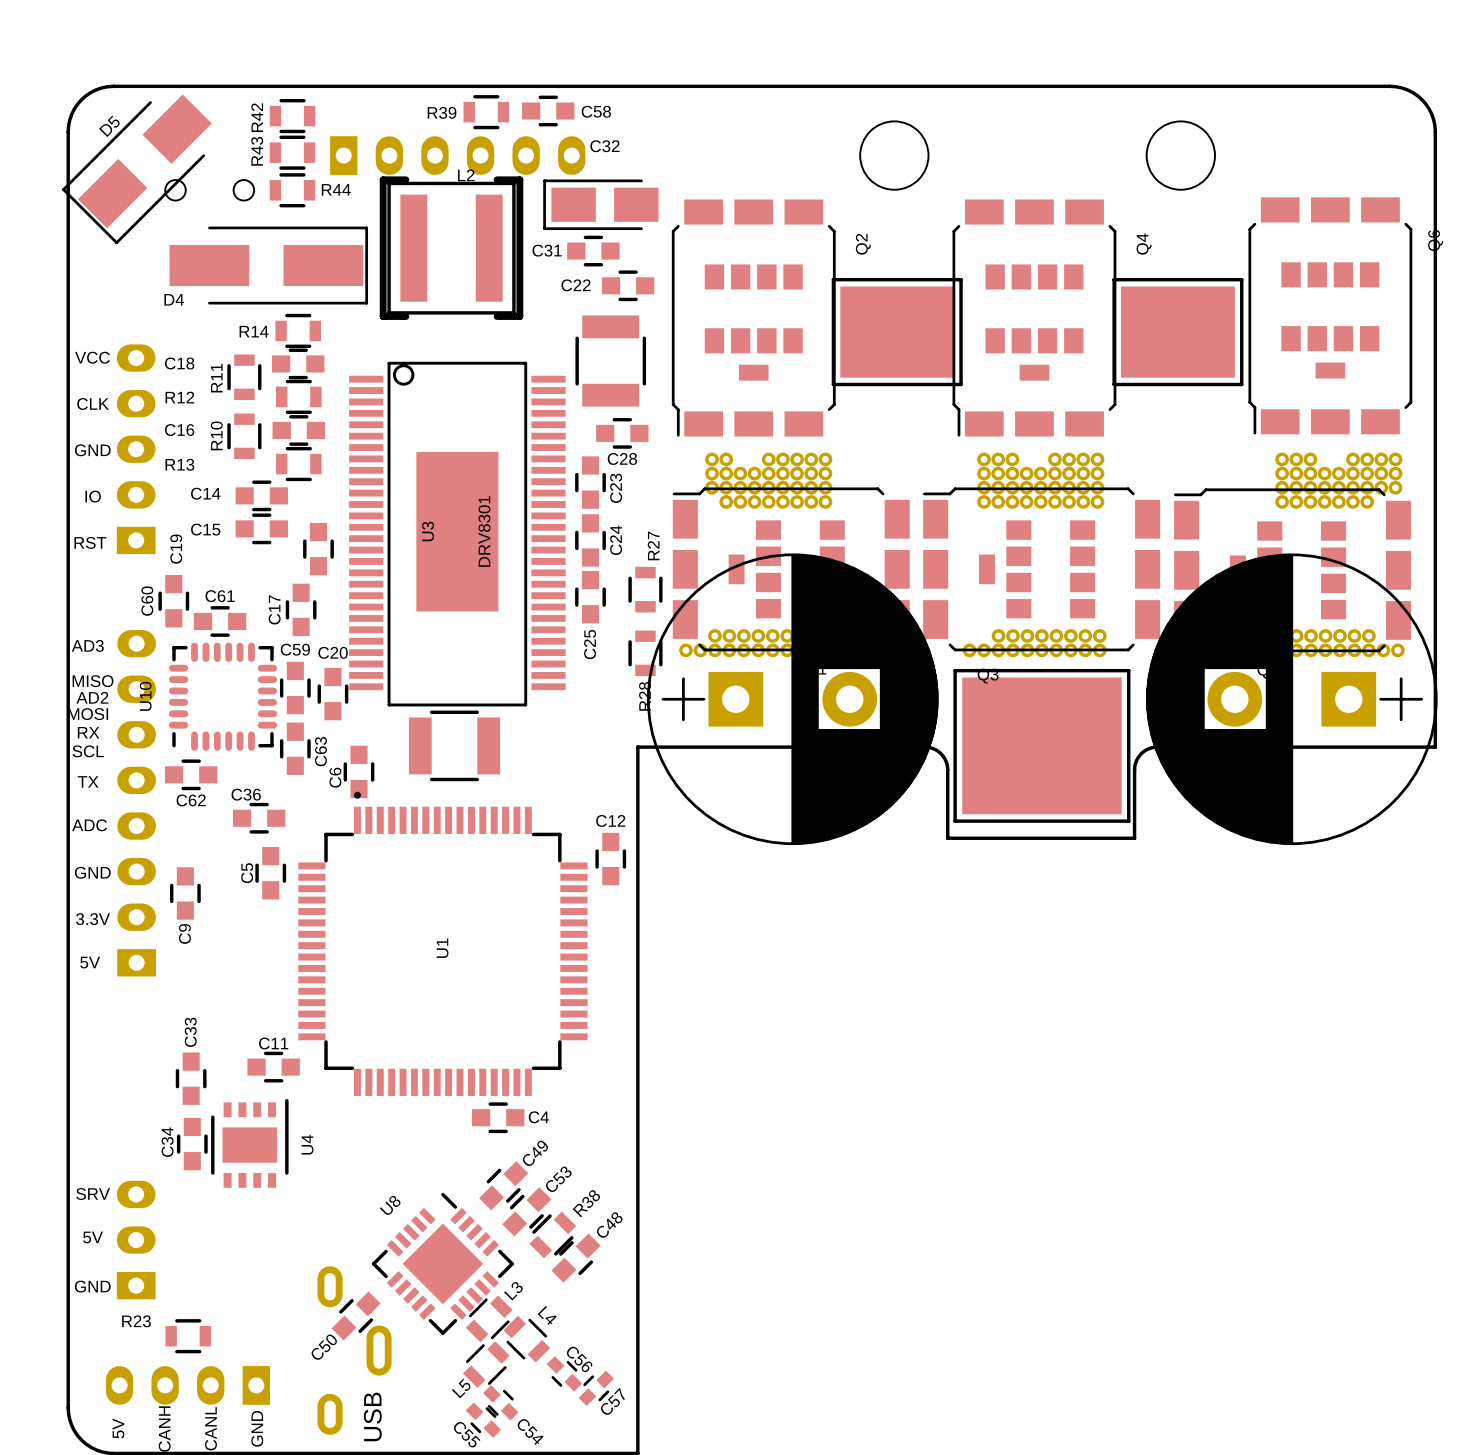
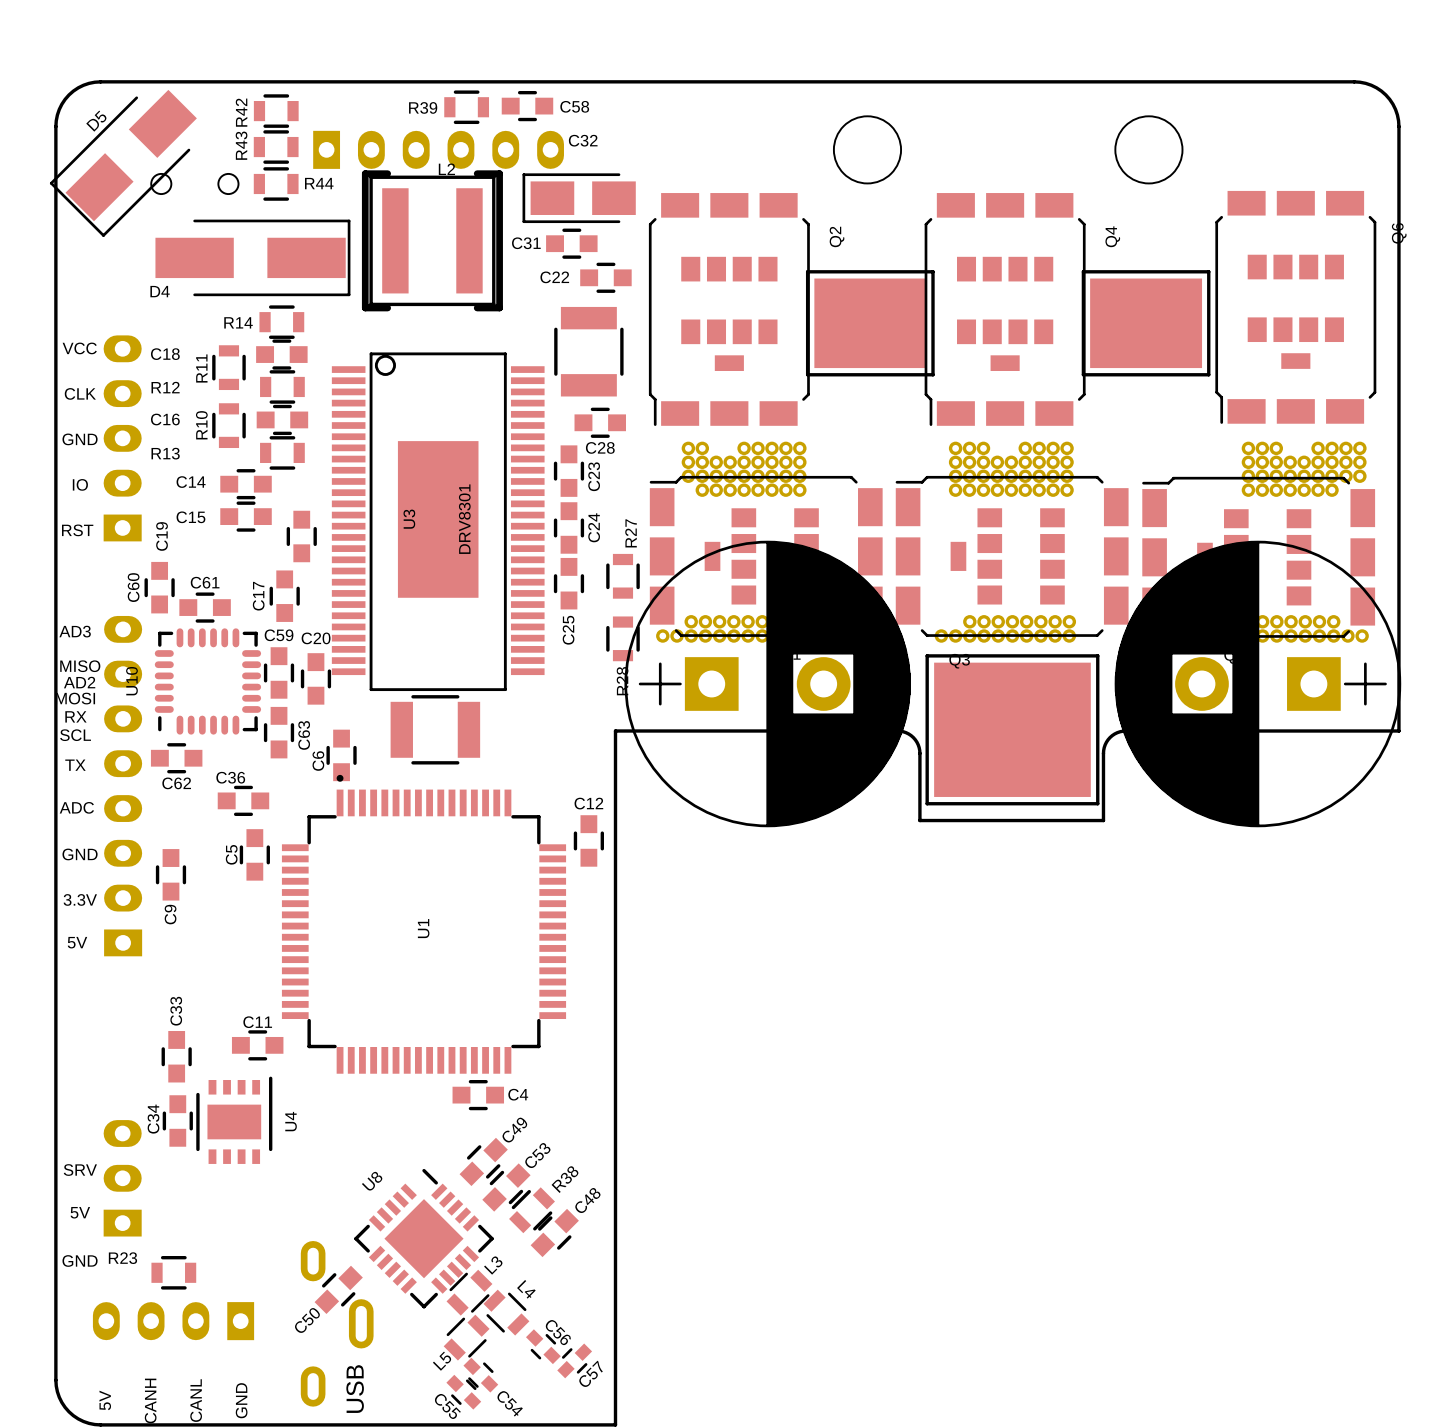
part position: (136, 1240) -> (122, 1178)
R23 position: (188, 1336) -> (173, 1272)
part position: (187, 1385) -> (173, 1321)

